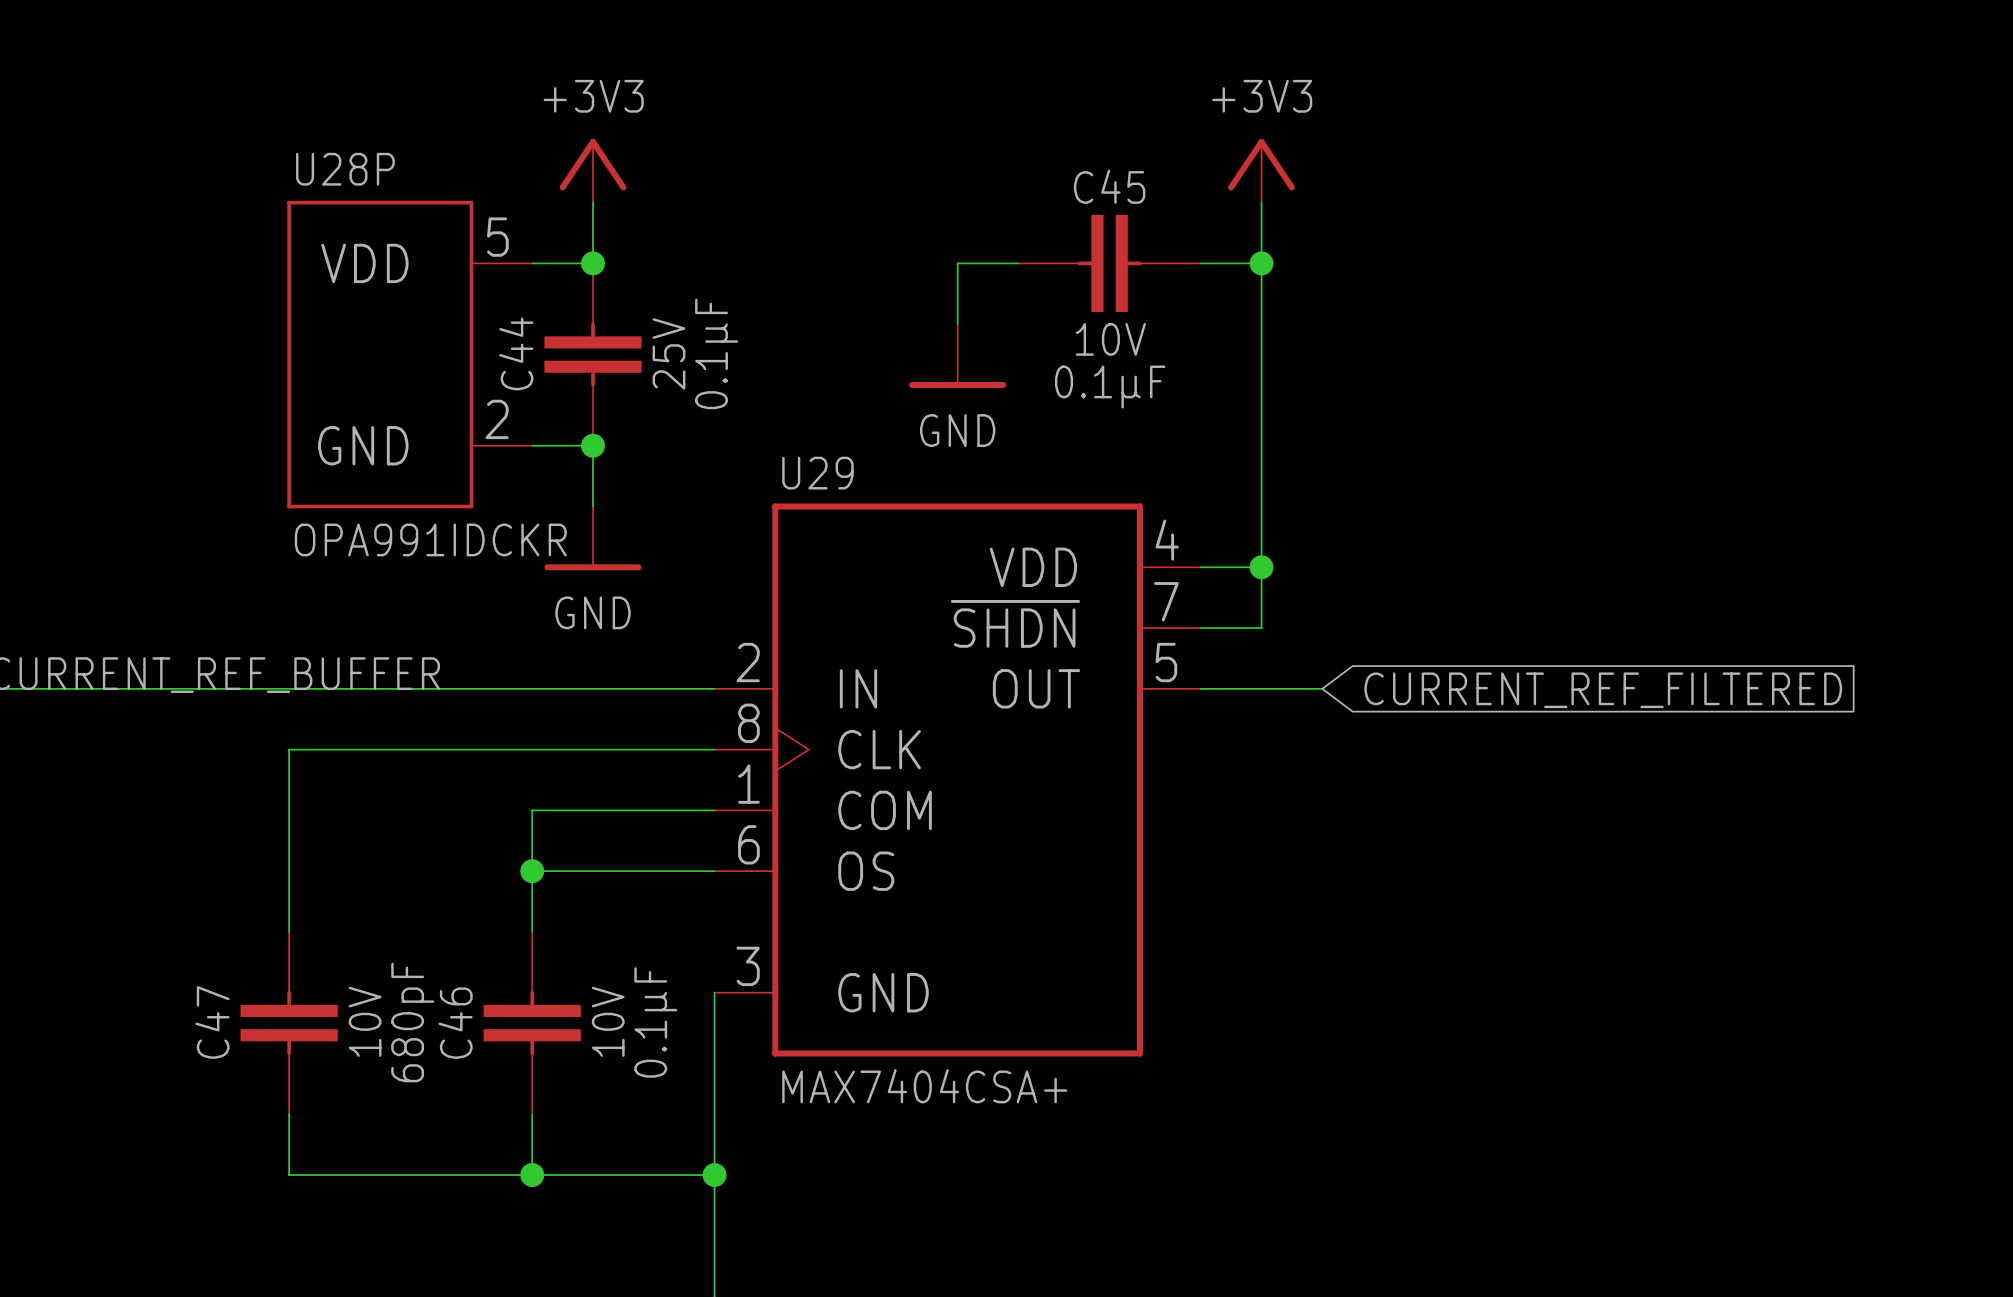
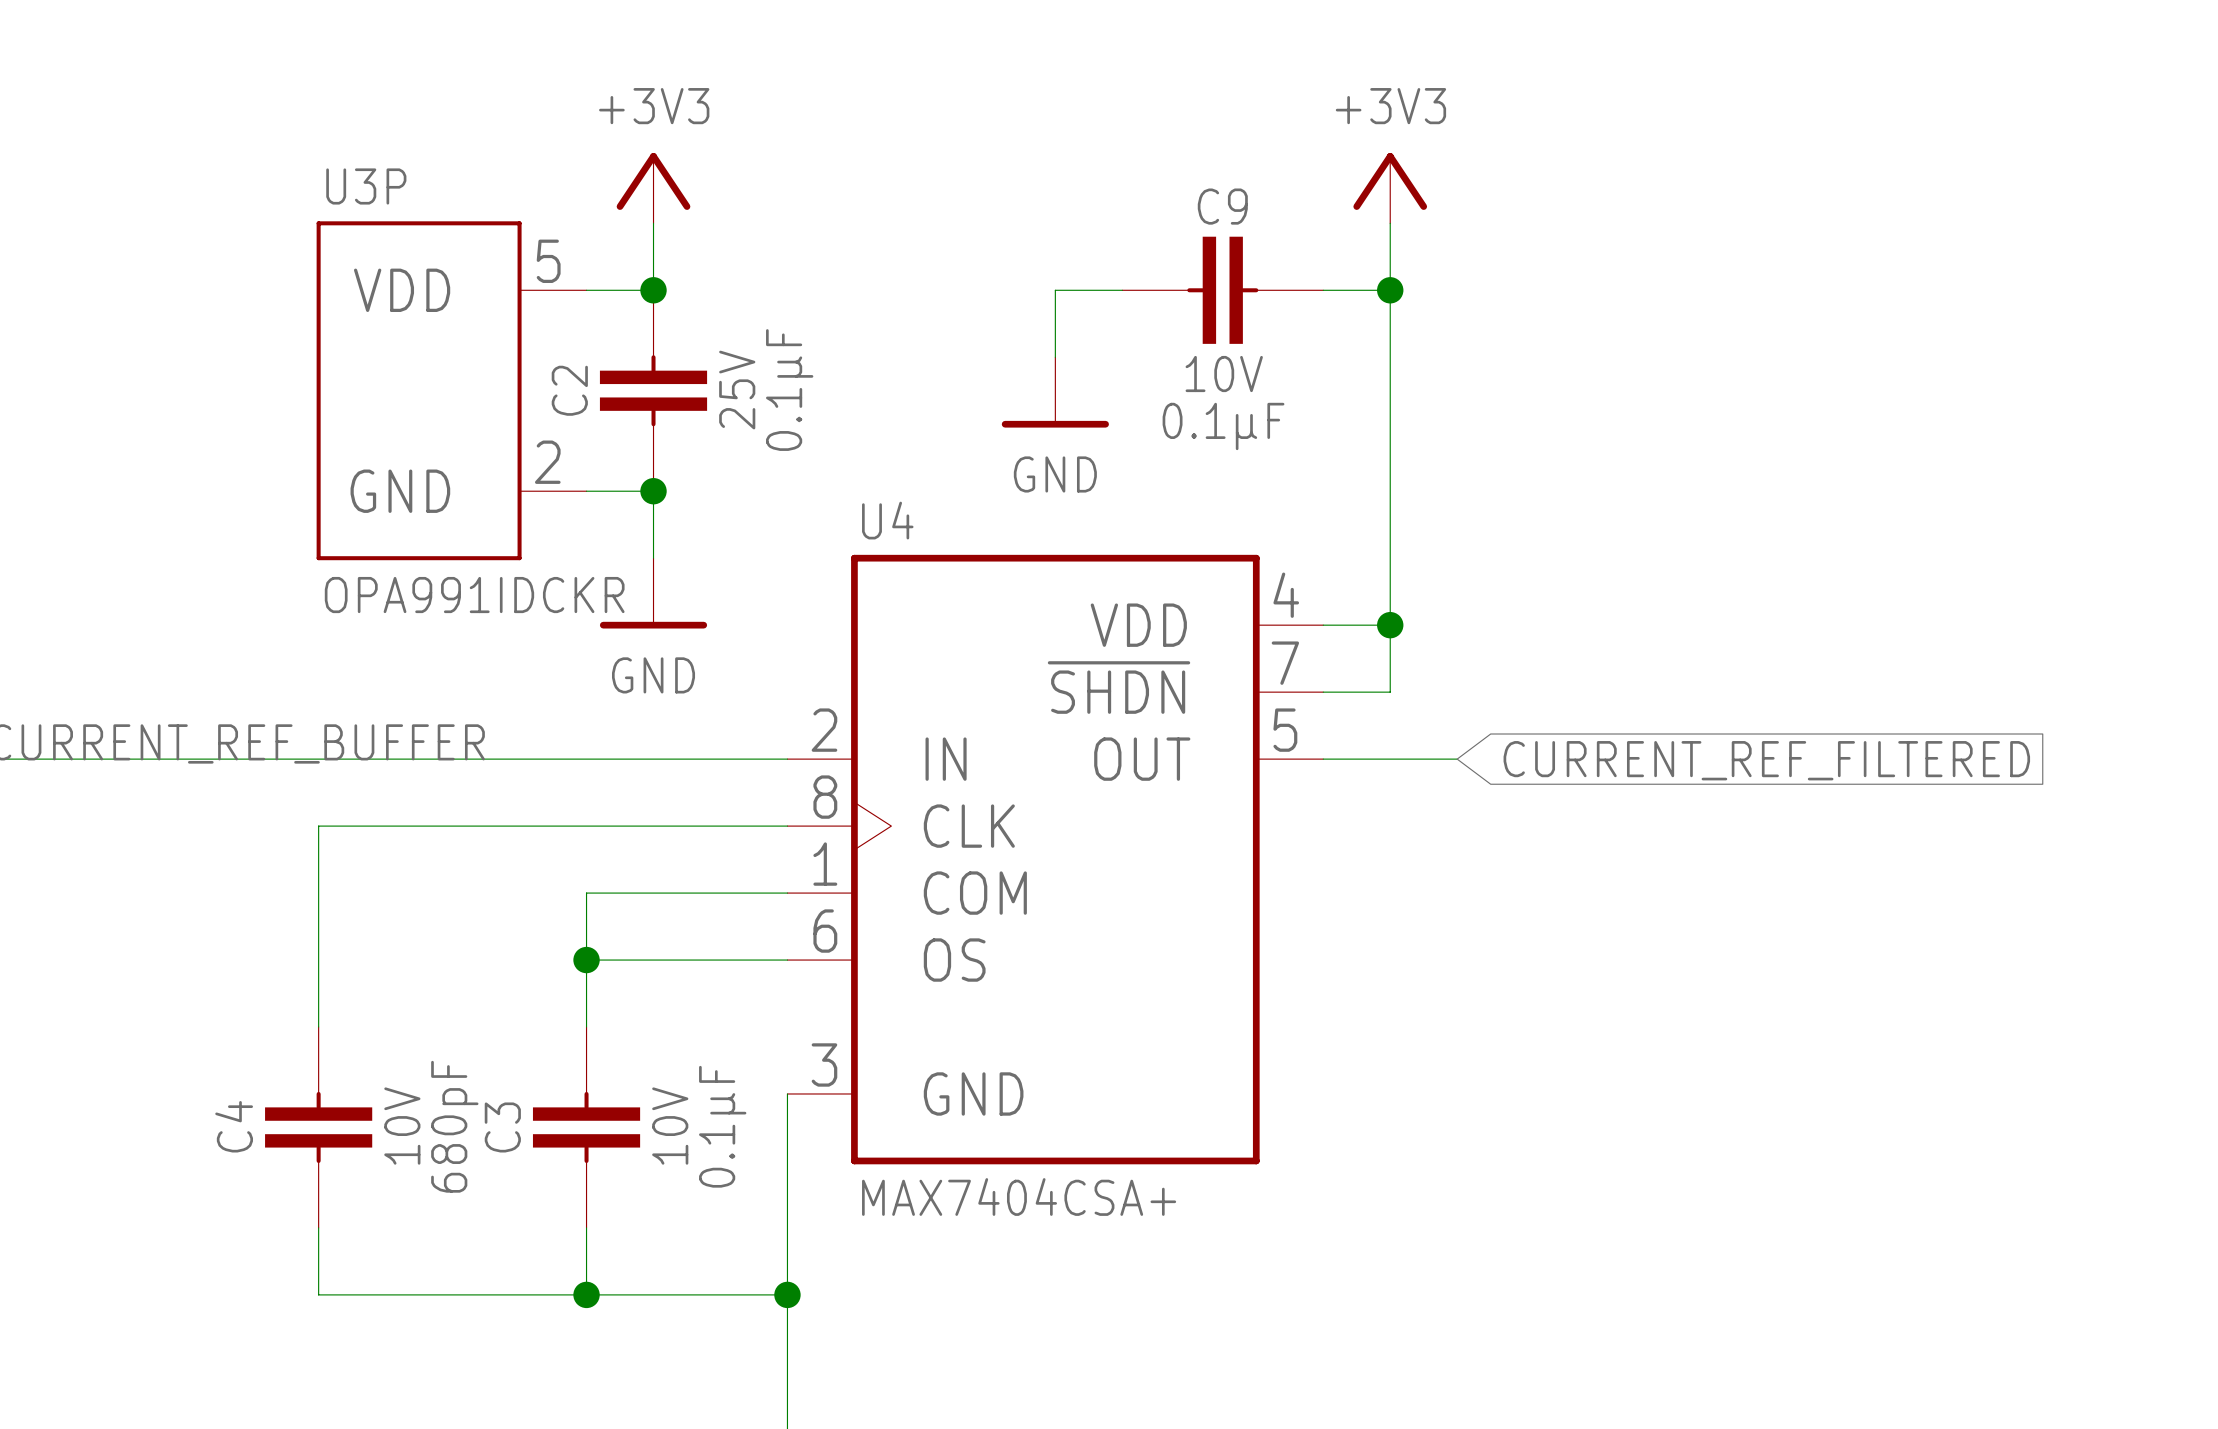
U28P name: U28P (345, 169) -> U3P (366, 186)
C45 name: C45 (1109, 186) -> C9 (1222, 206)
C44 name: C44 (516, 353) -> C2 (569, 390)
U29 name: U29 (817, 473) -> U4 (887, 520)
C47 name: C47 (212, 1022) -> C4 (234, 1126)
C46 name: C46 (455, 1023) -> C3 (502, 1127)

